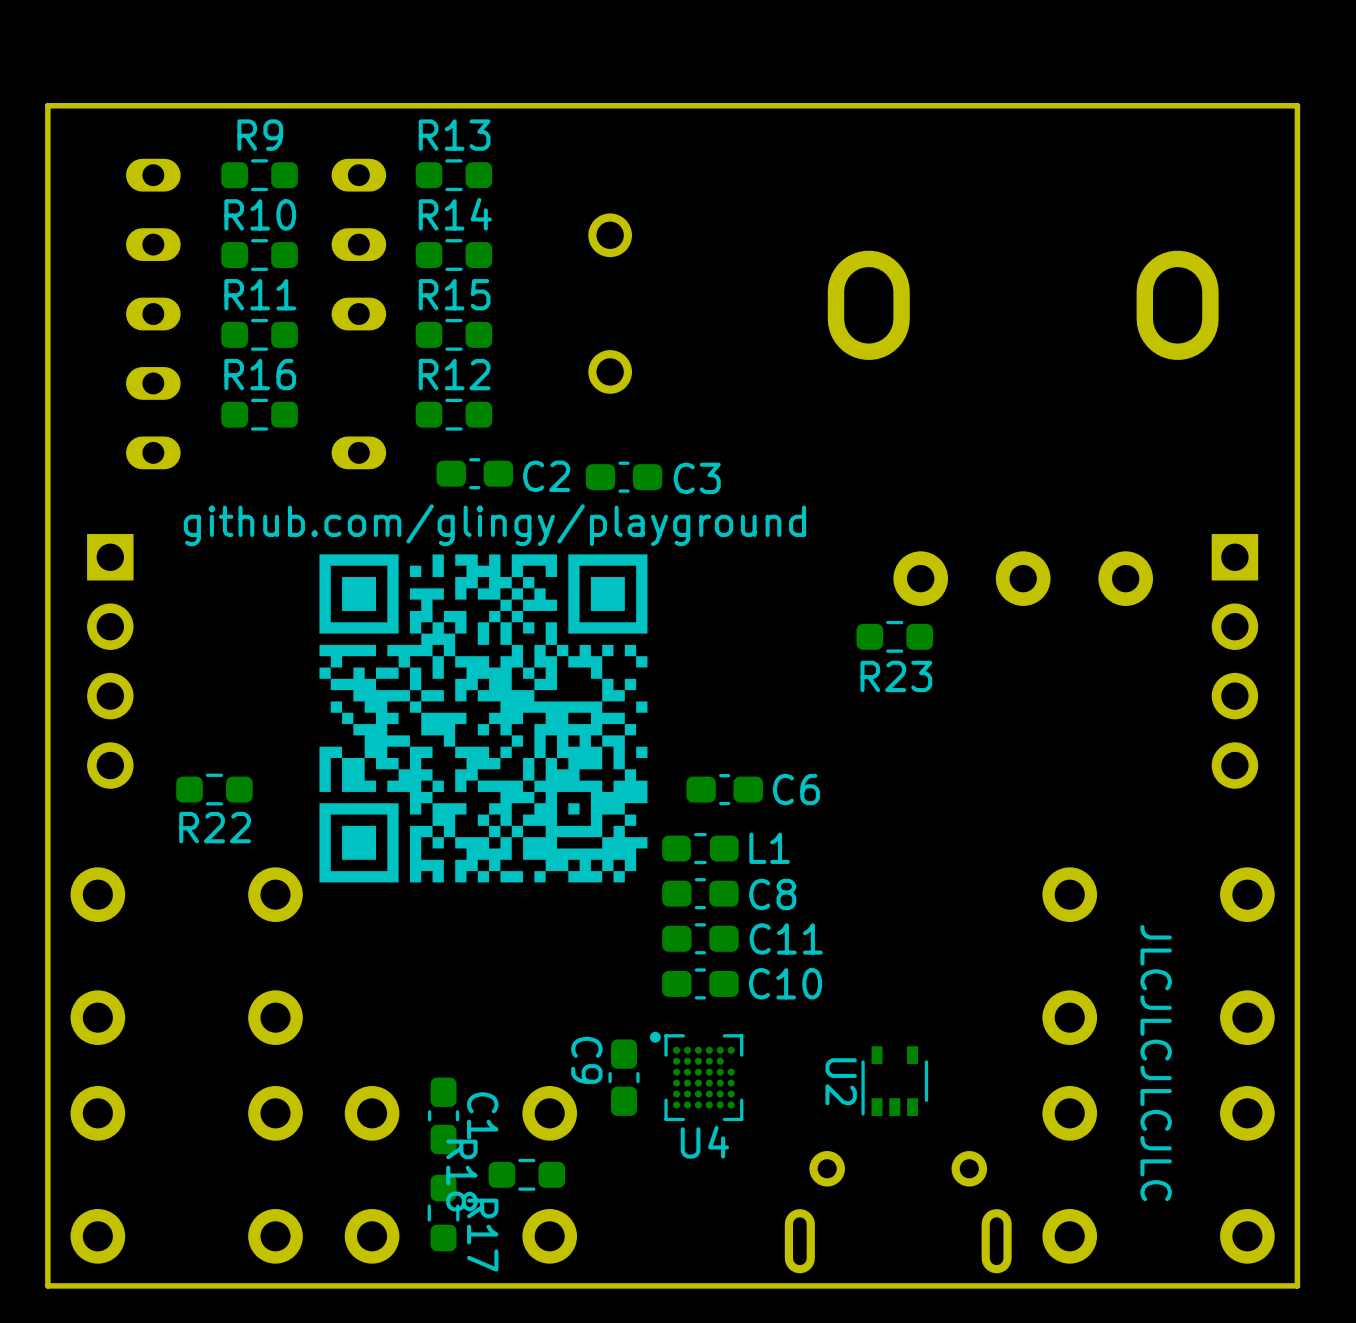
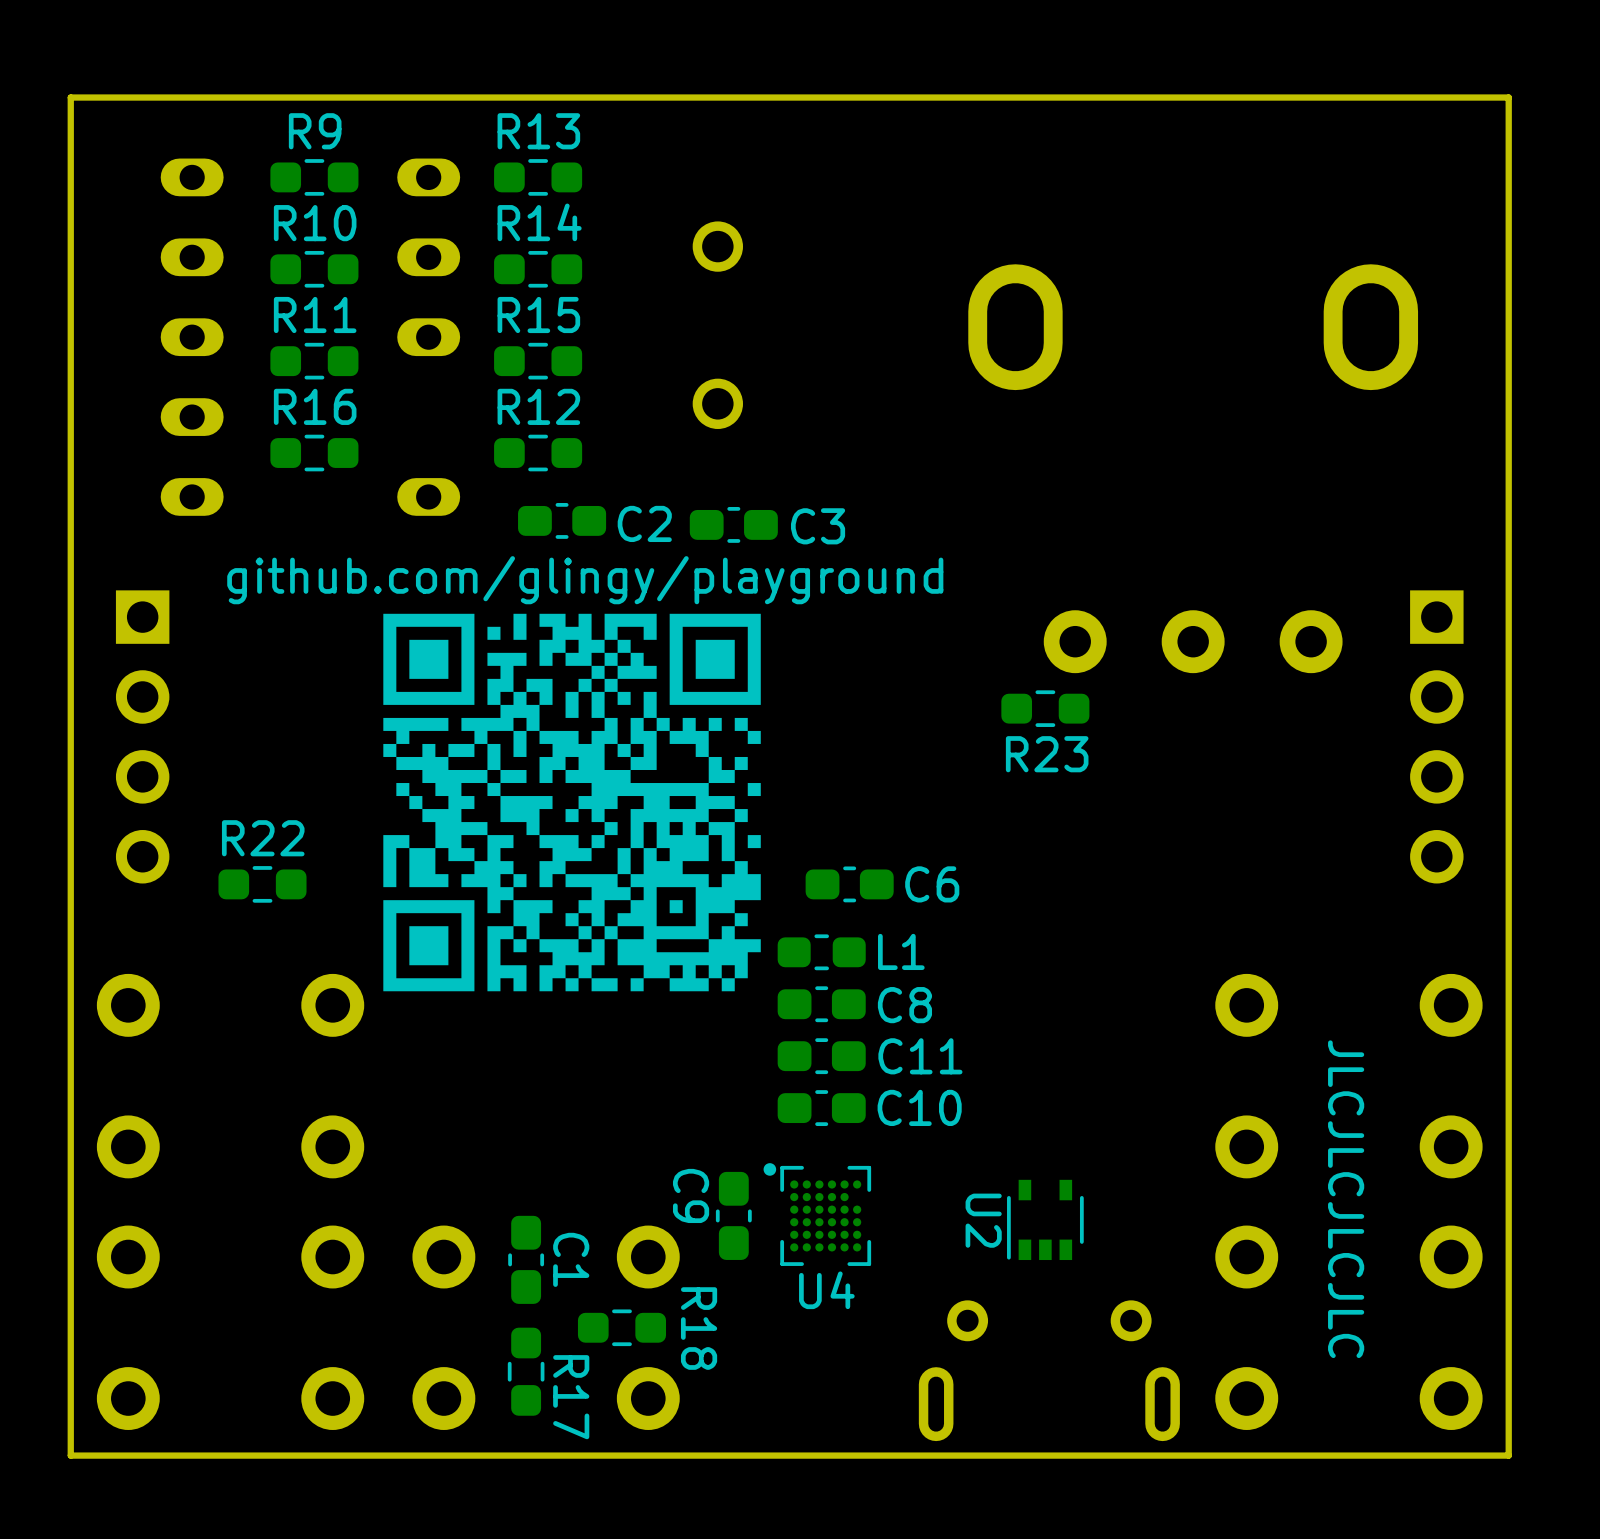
R22 name position: R22 (215, 827) -> R22 (263, 838)
R18 name position: R18 (461, 1175) -> R18 (699, 1328)

